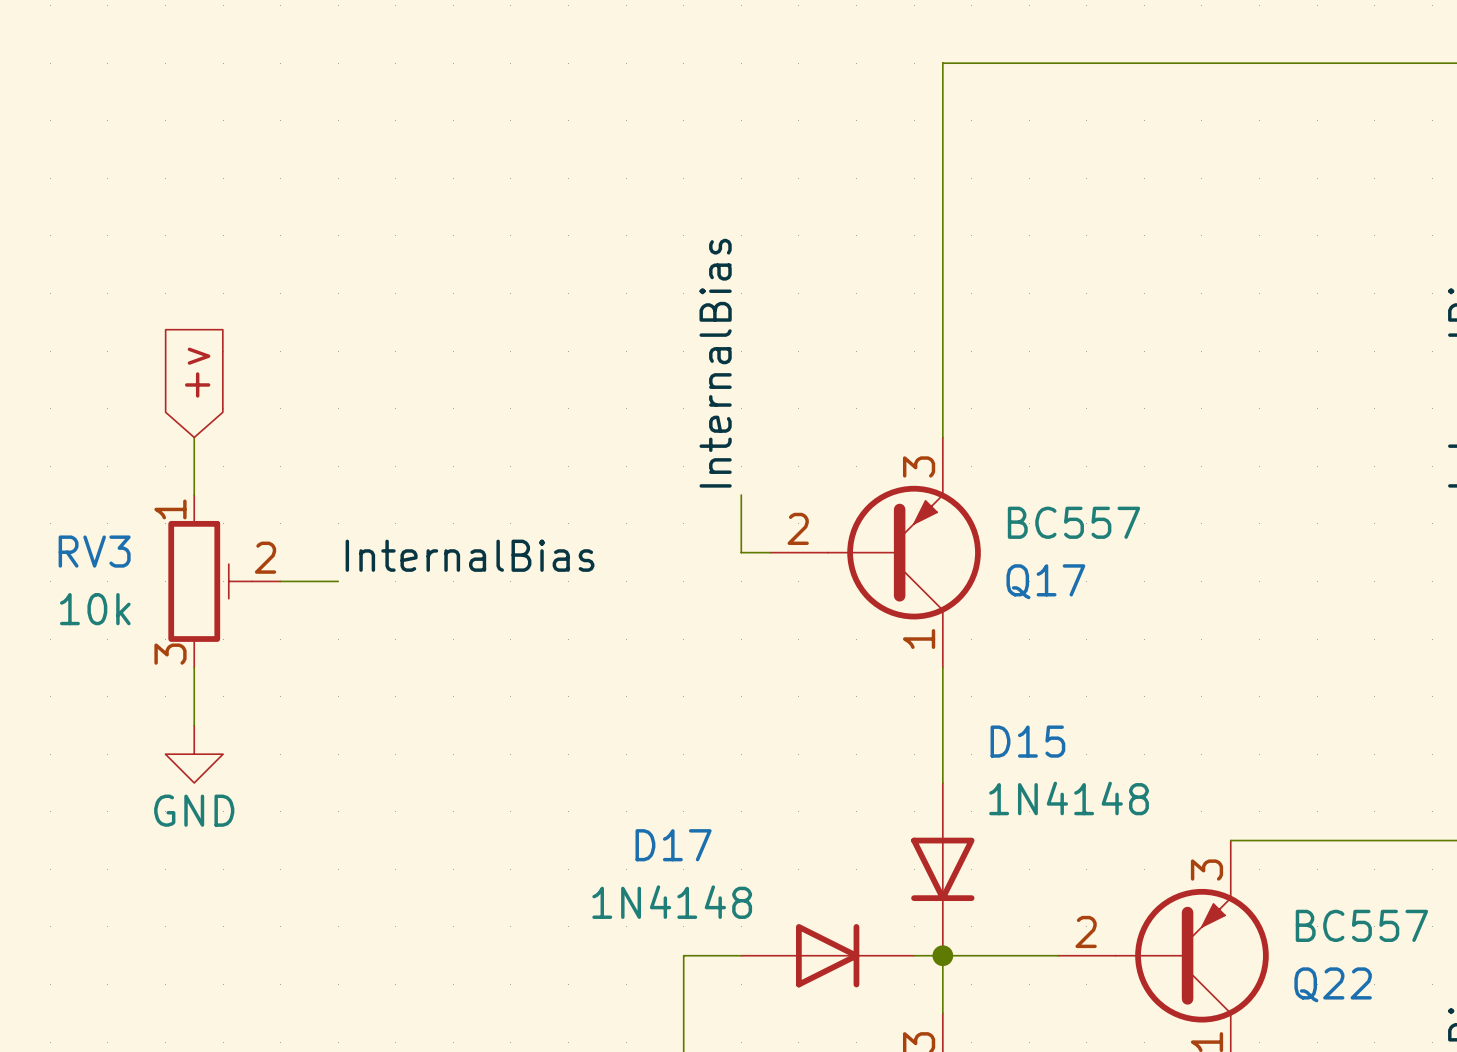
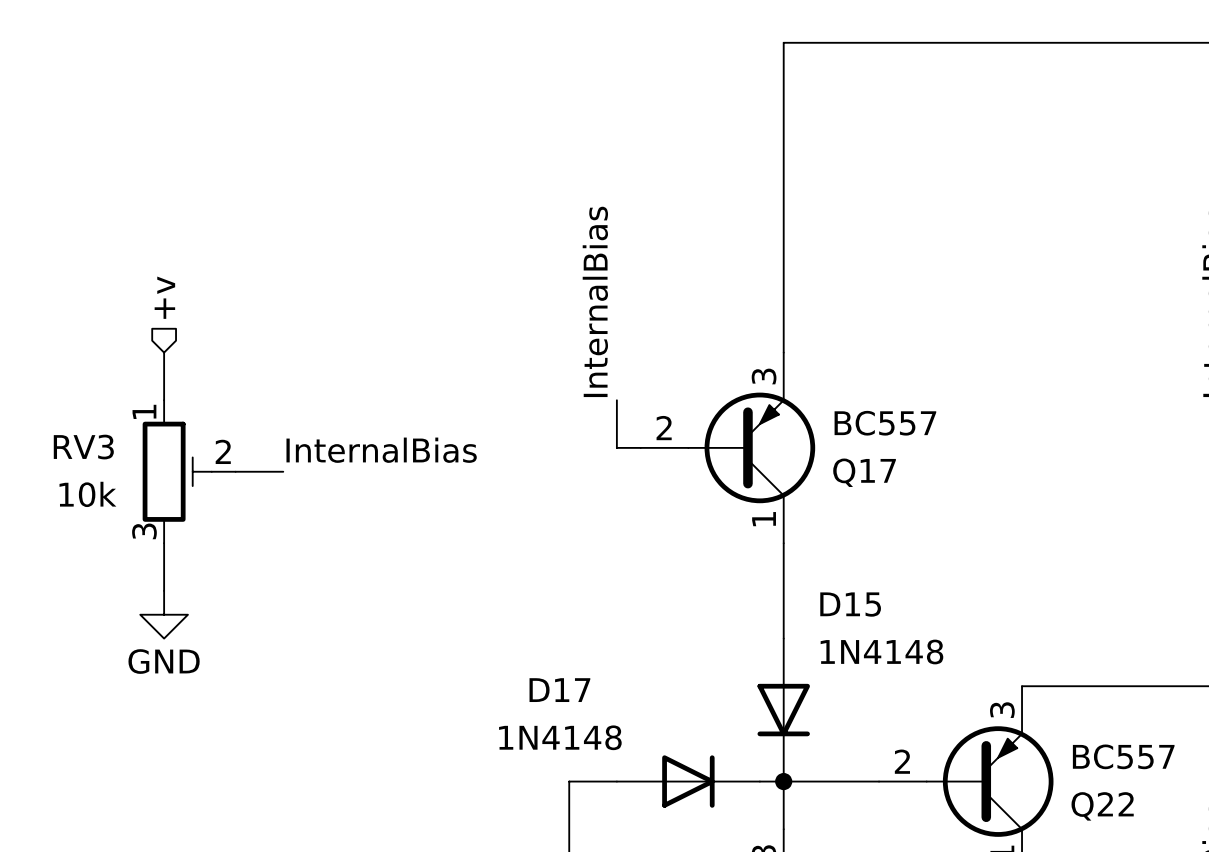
hierarchical label: none -> +v (164, 297)
global label: +v (197, 372) -> none

